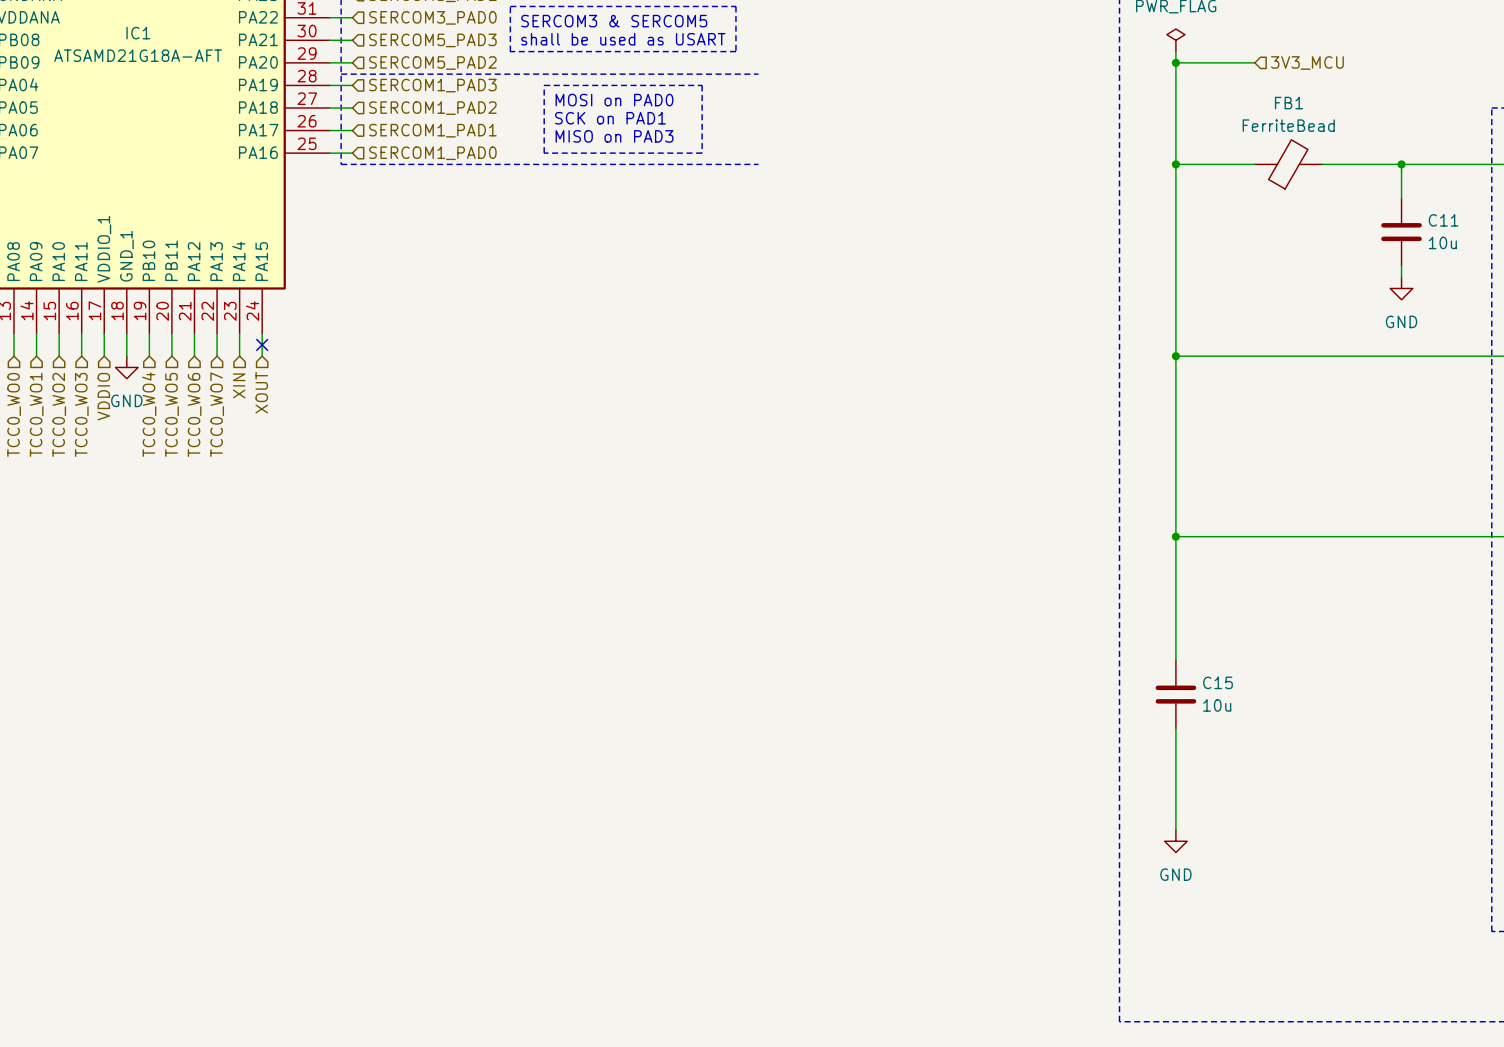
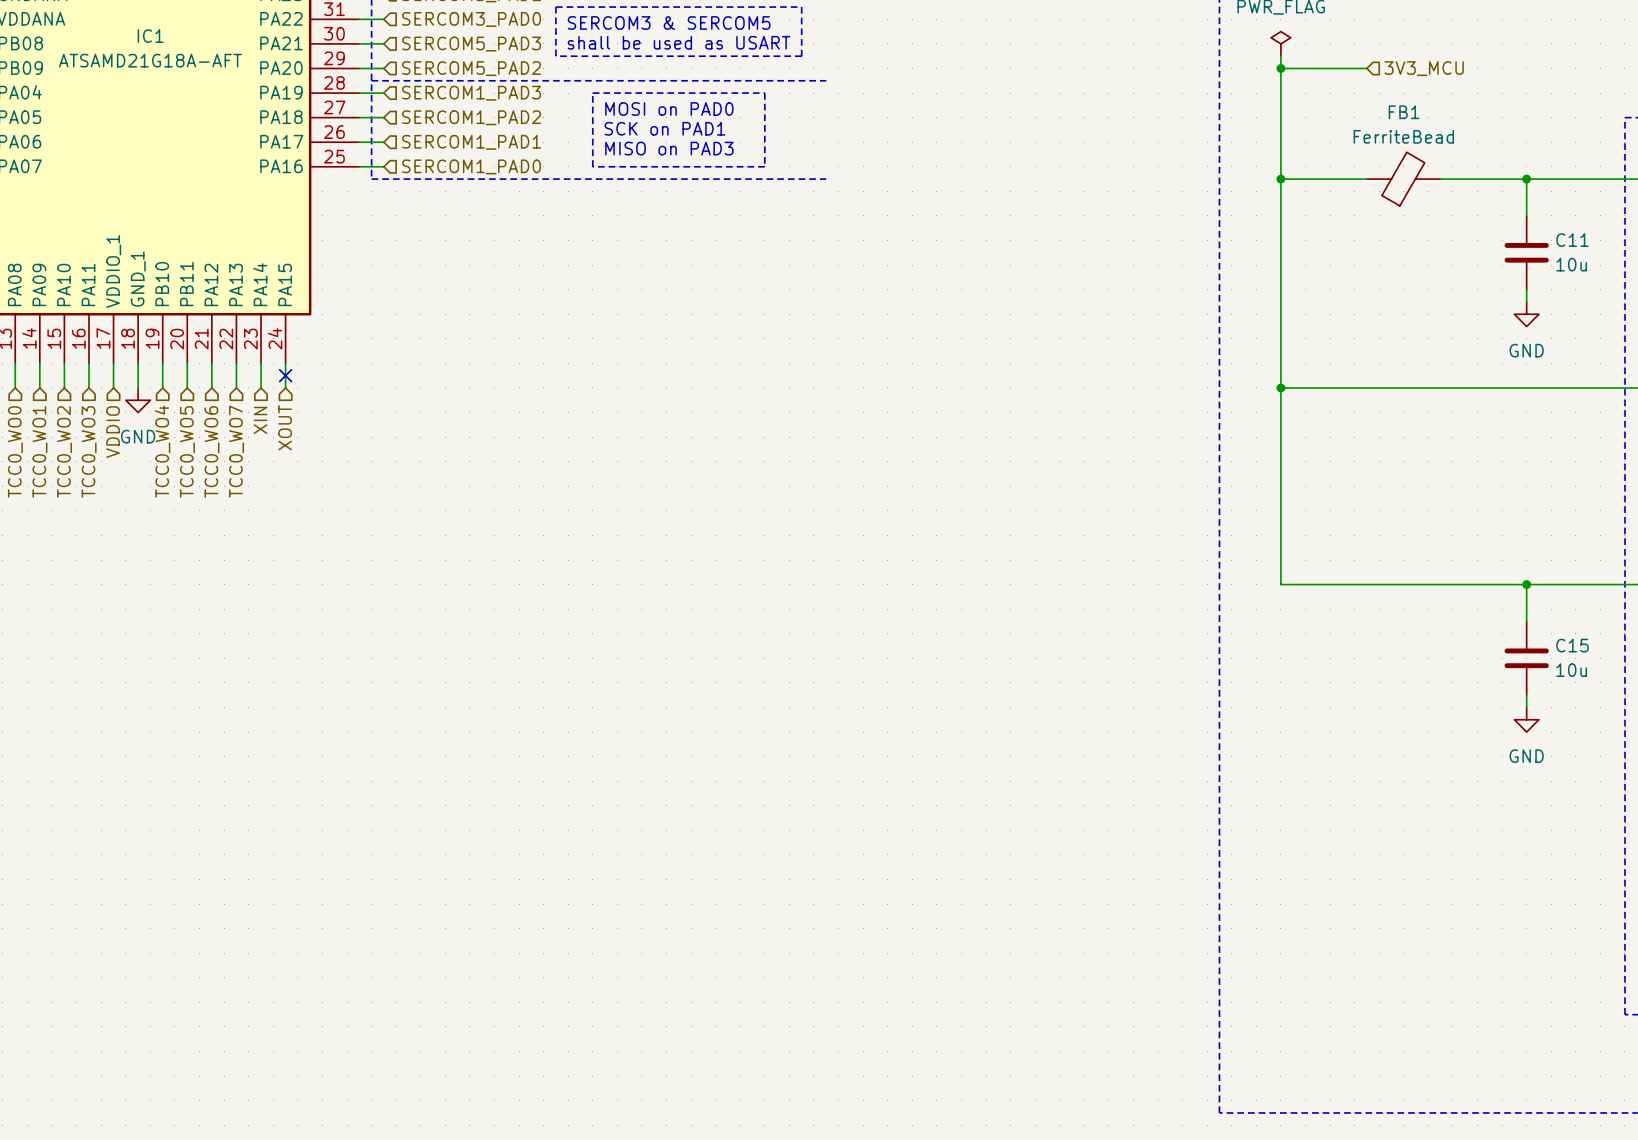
wire: (1175, 536) (1175, 660) -> none
junction: (1175, 536) -> none
wire: none -> (1526, 584) (1526, 621)
junction: none -> (1526, 584)
wire: none -> (1526, 695) (1526, 707)
power symbol: none -> GND (1526, 719)
C15 position: (1175, 694) -> (1526, 658)
wire: (1175, 728) (1175, 829) -> none
power symbol: GND (1175, 841) -> none

